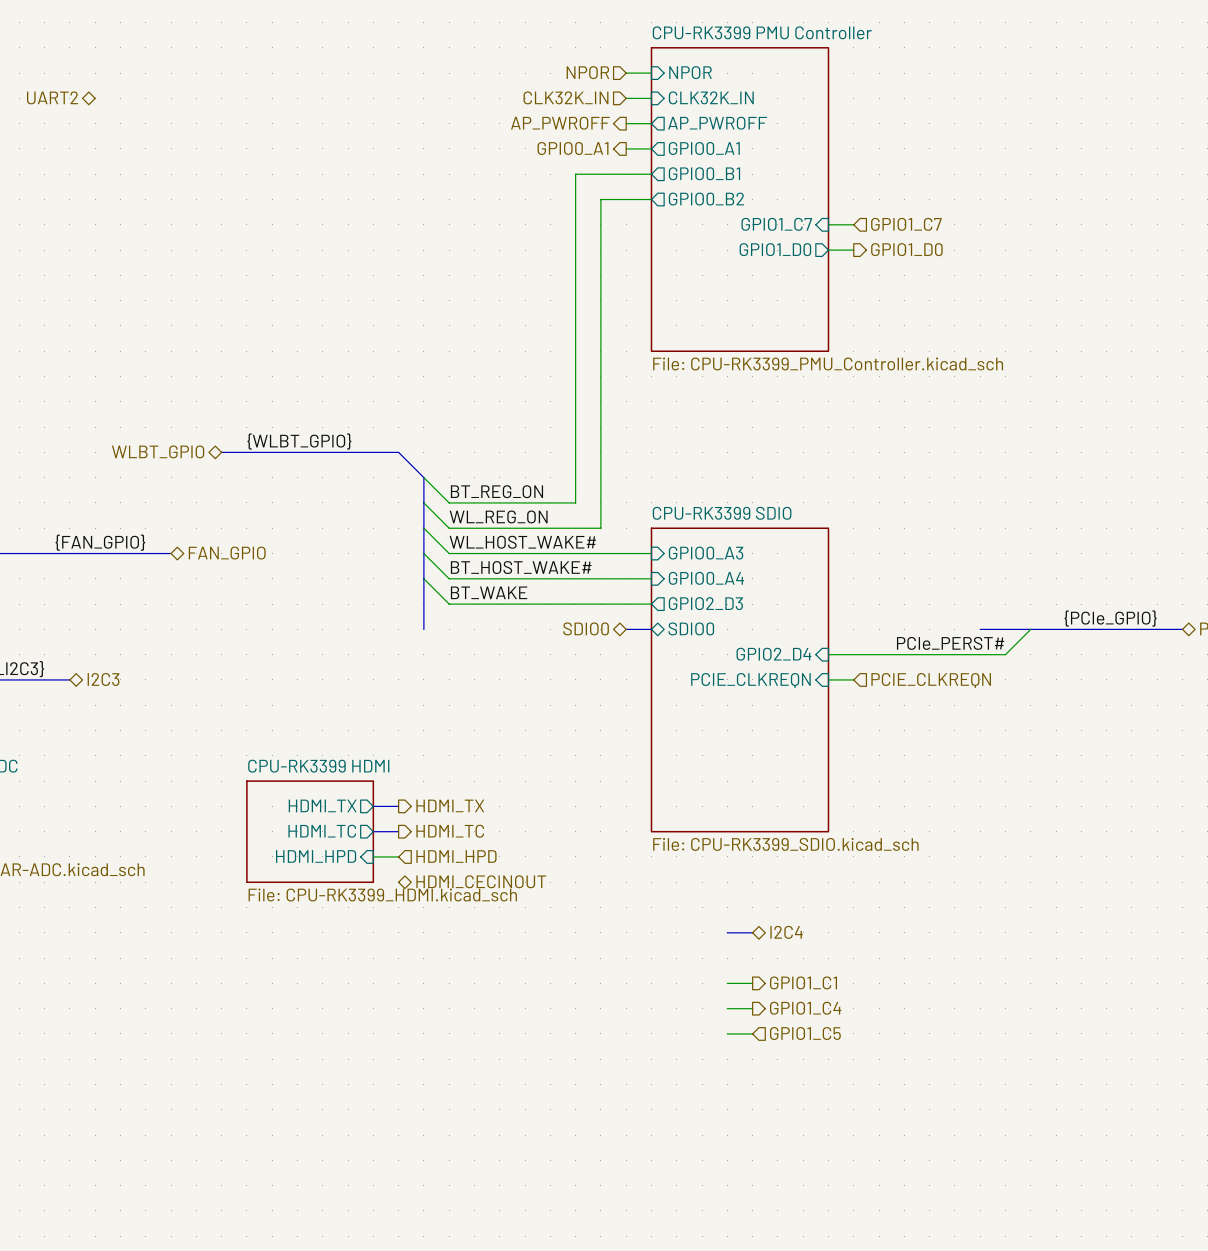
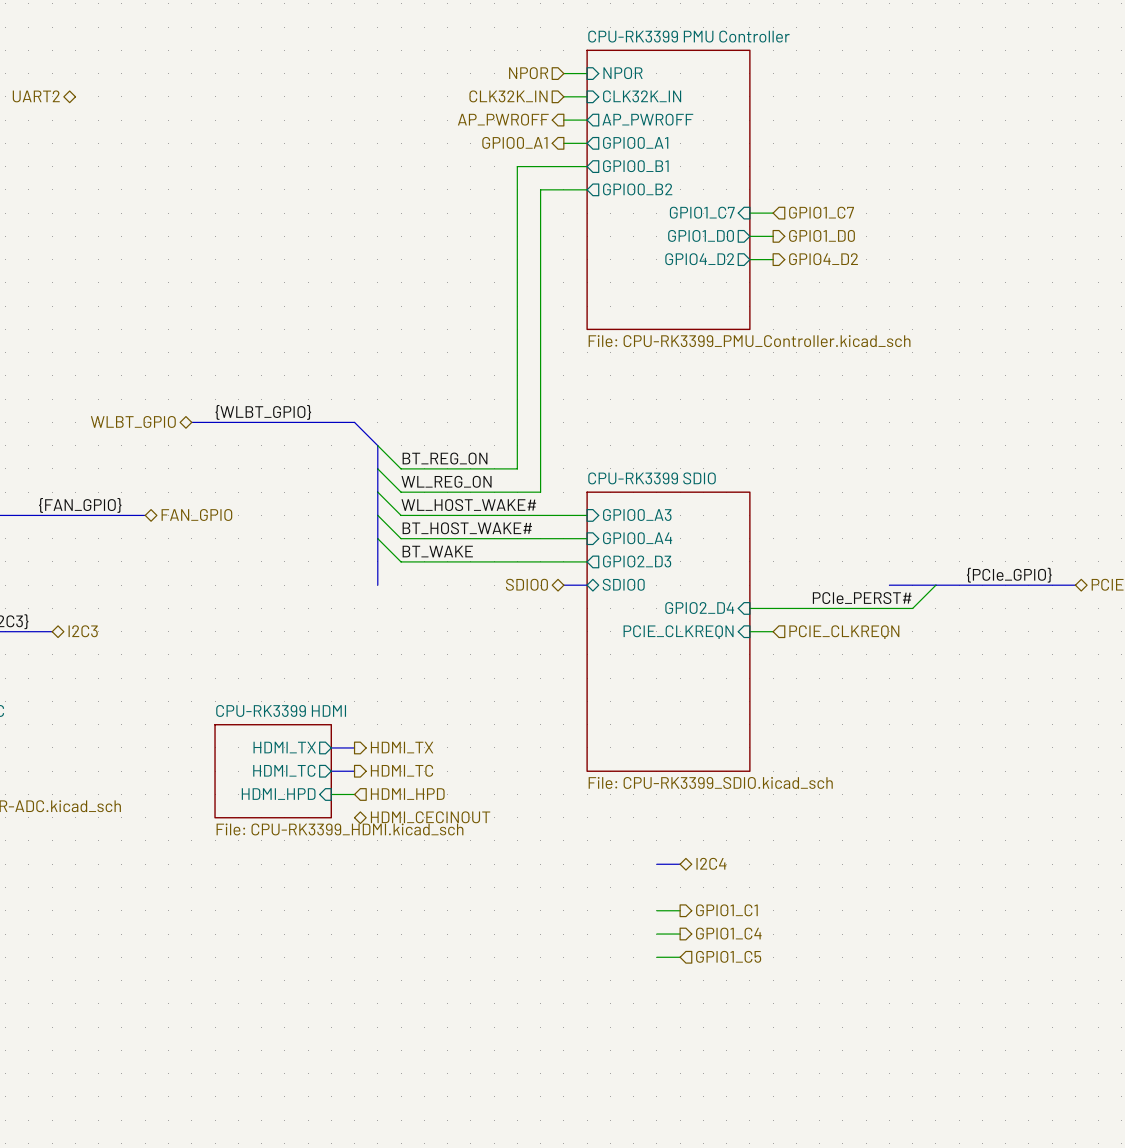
sheet pin: none -> GPIO4_D2 (699, 259)
hierarchical label: none -> GPIO4_D2 (823, 259)
wire: none -> (749, 259) (773, 259)

